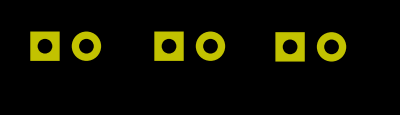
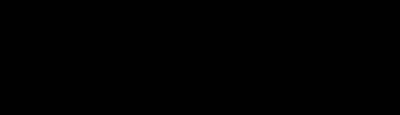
part: (65, 46) -> none
part: (189, 46) -> none
part: (310, 46) -> none

